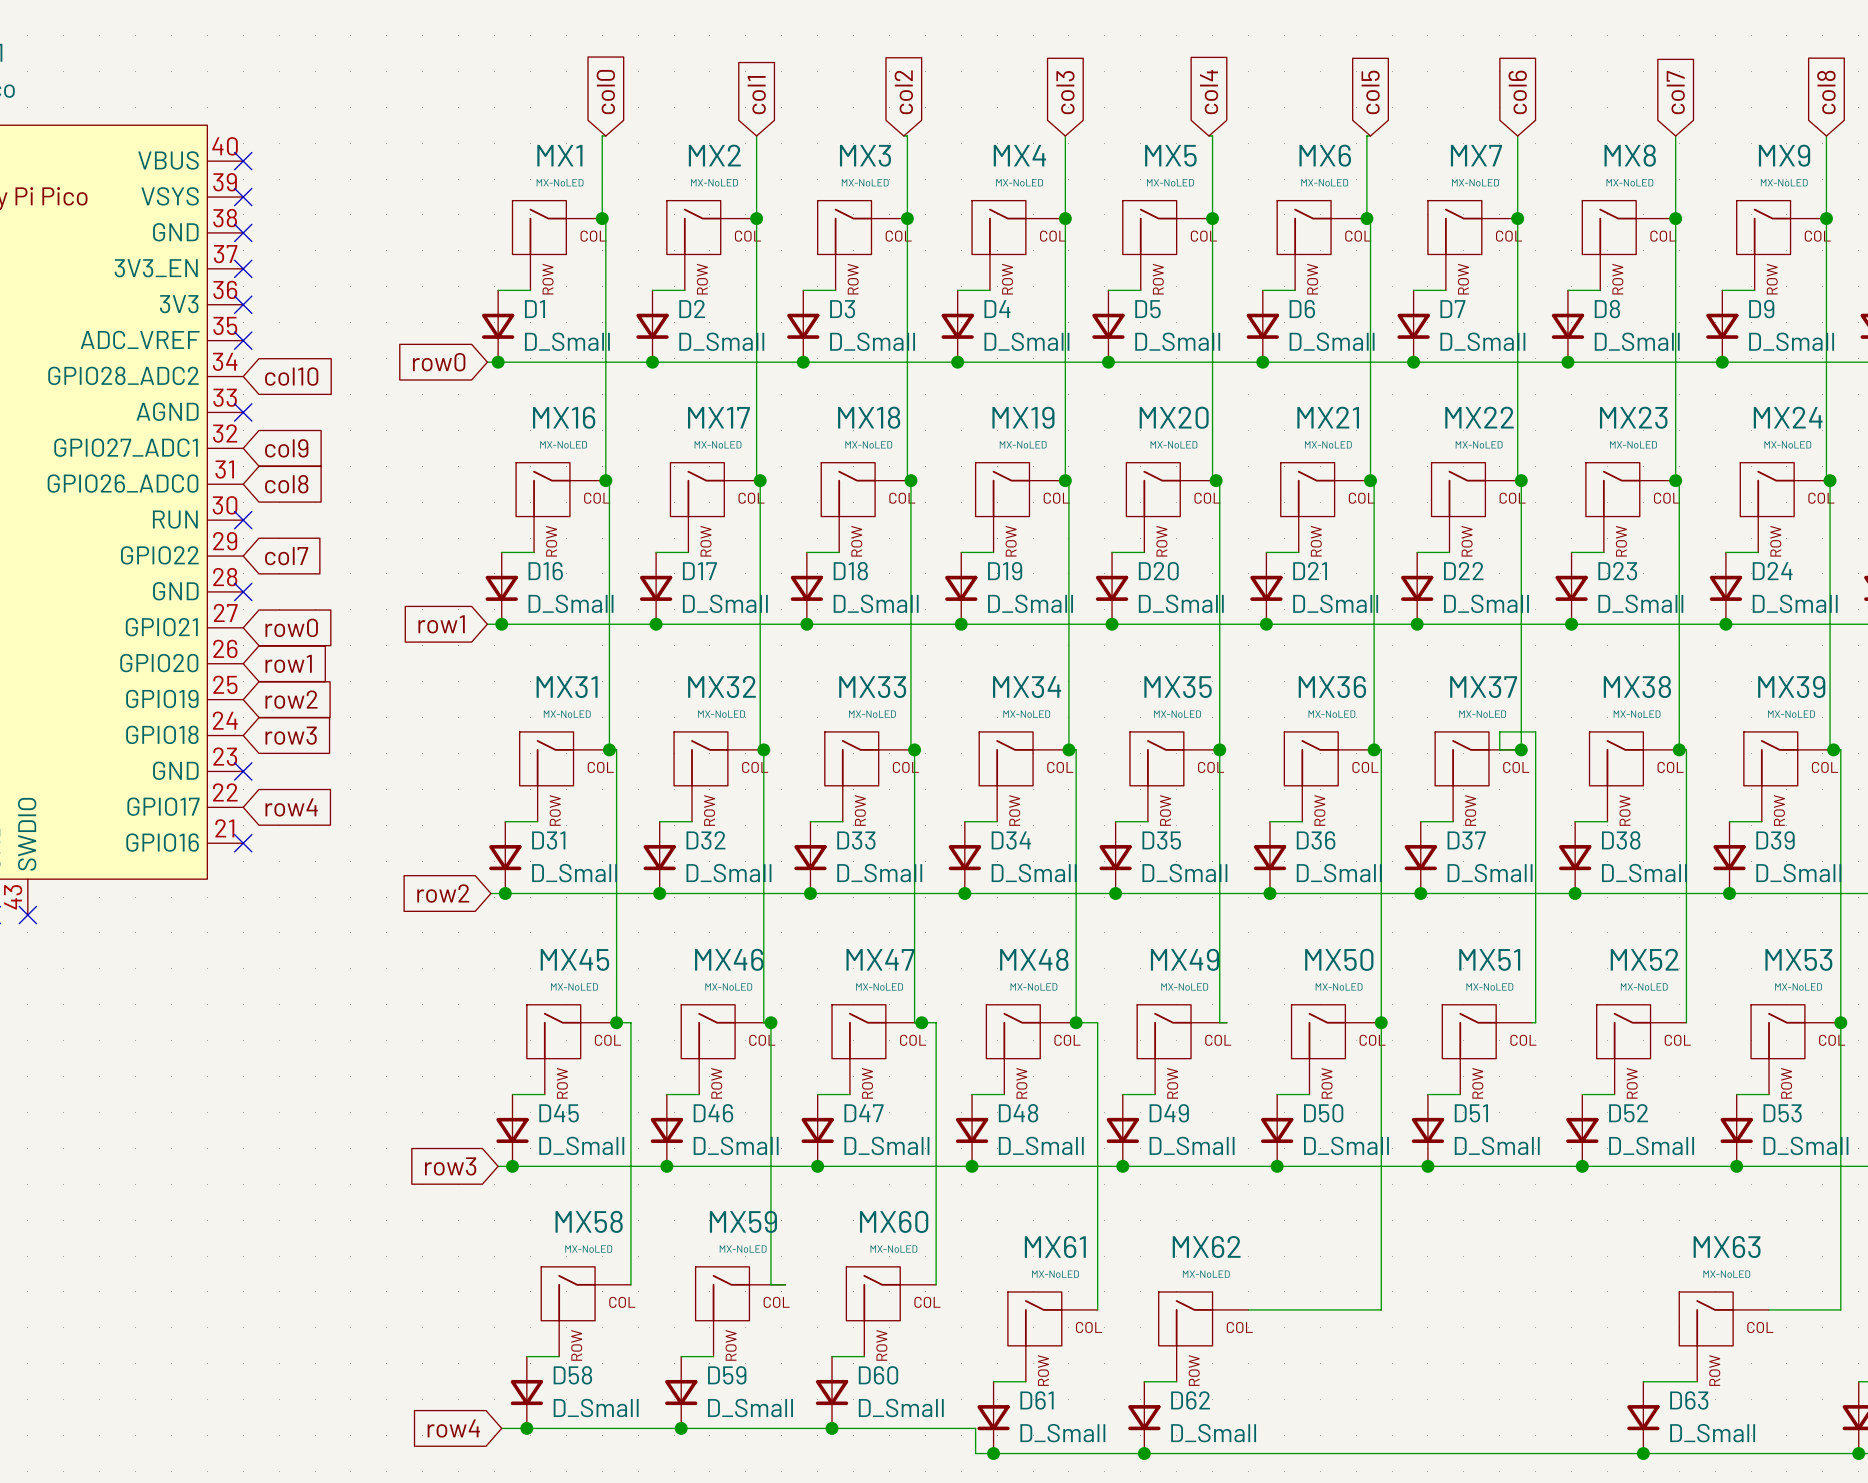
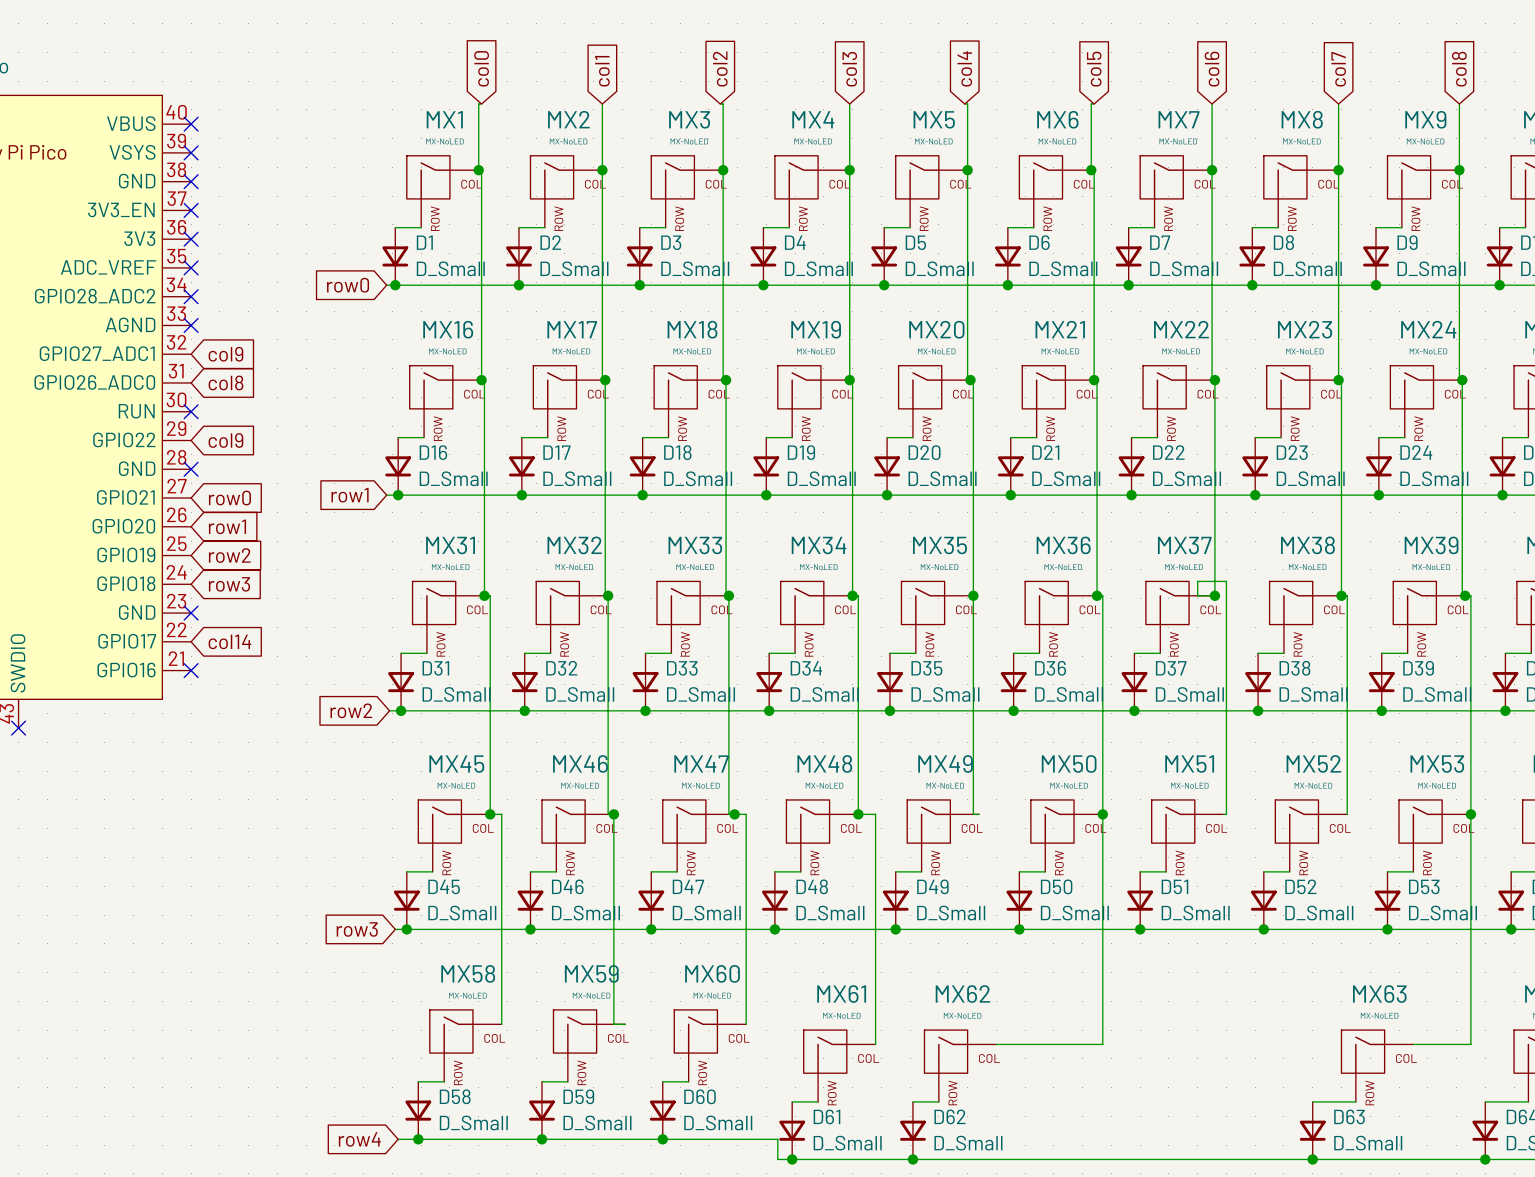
no-connect mark: none -> (191, 296)
global label: col10 (291, 376) -> none
global label: col7 (286, 556) -> col9 (225, 440)
global label: row4 (291, 807) -> col14 (229, 641)

